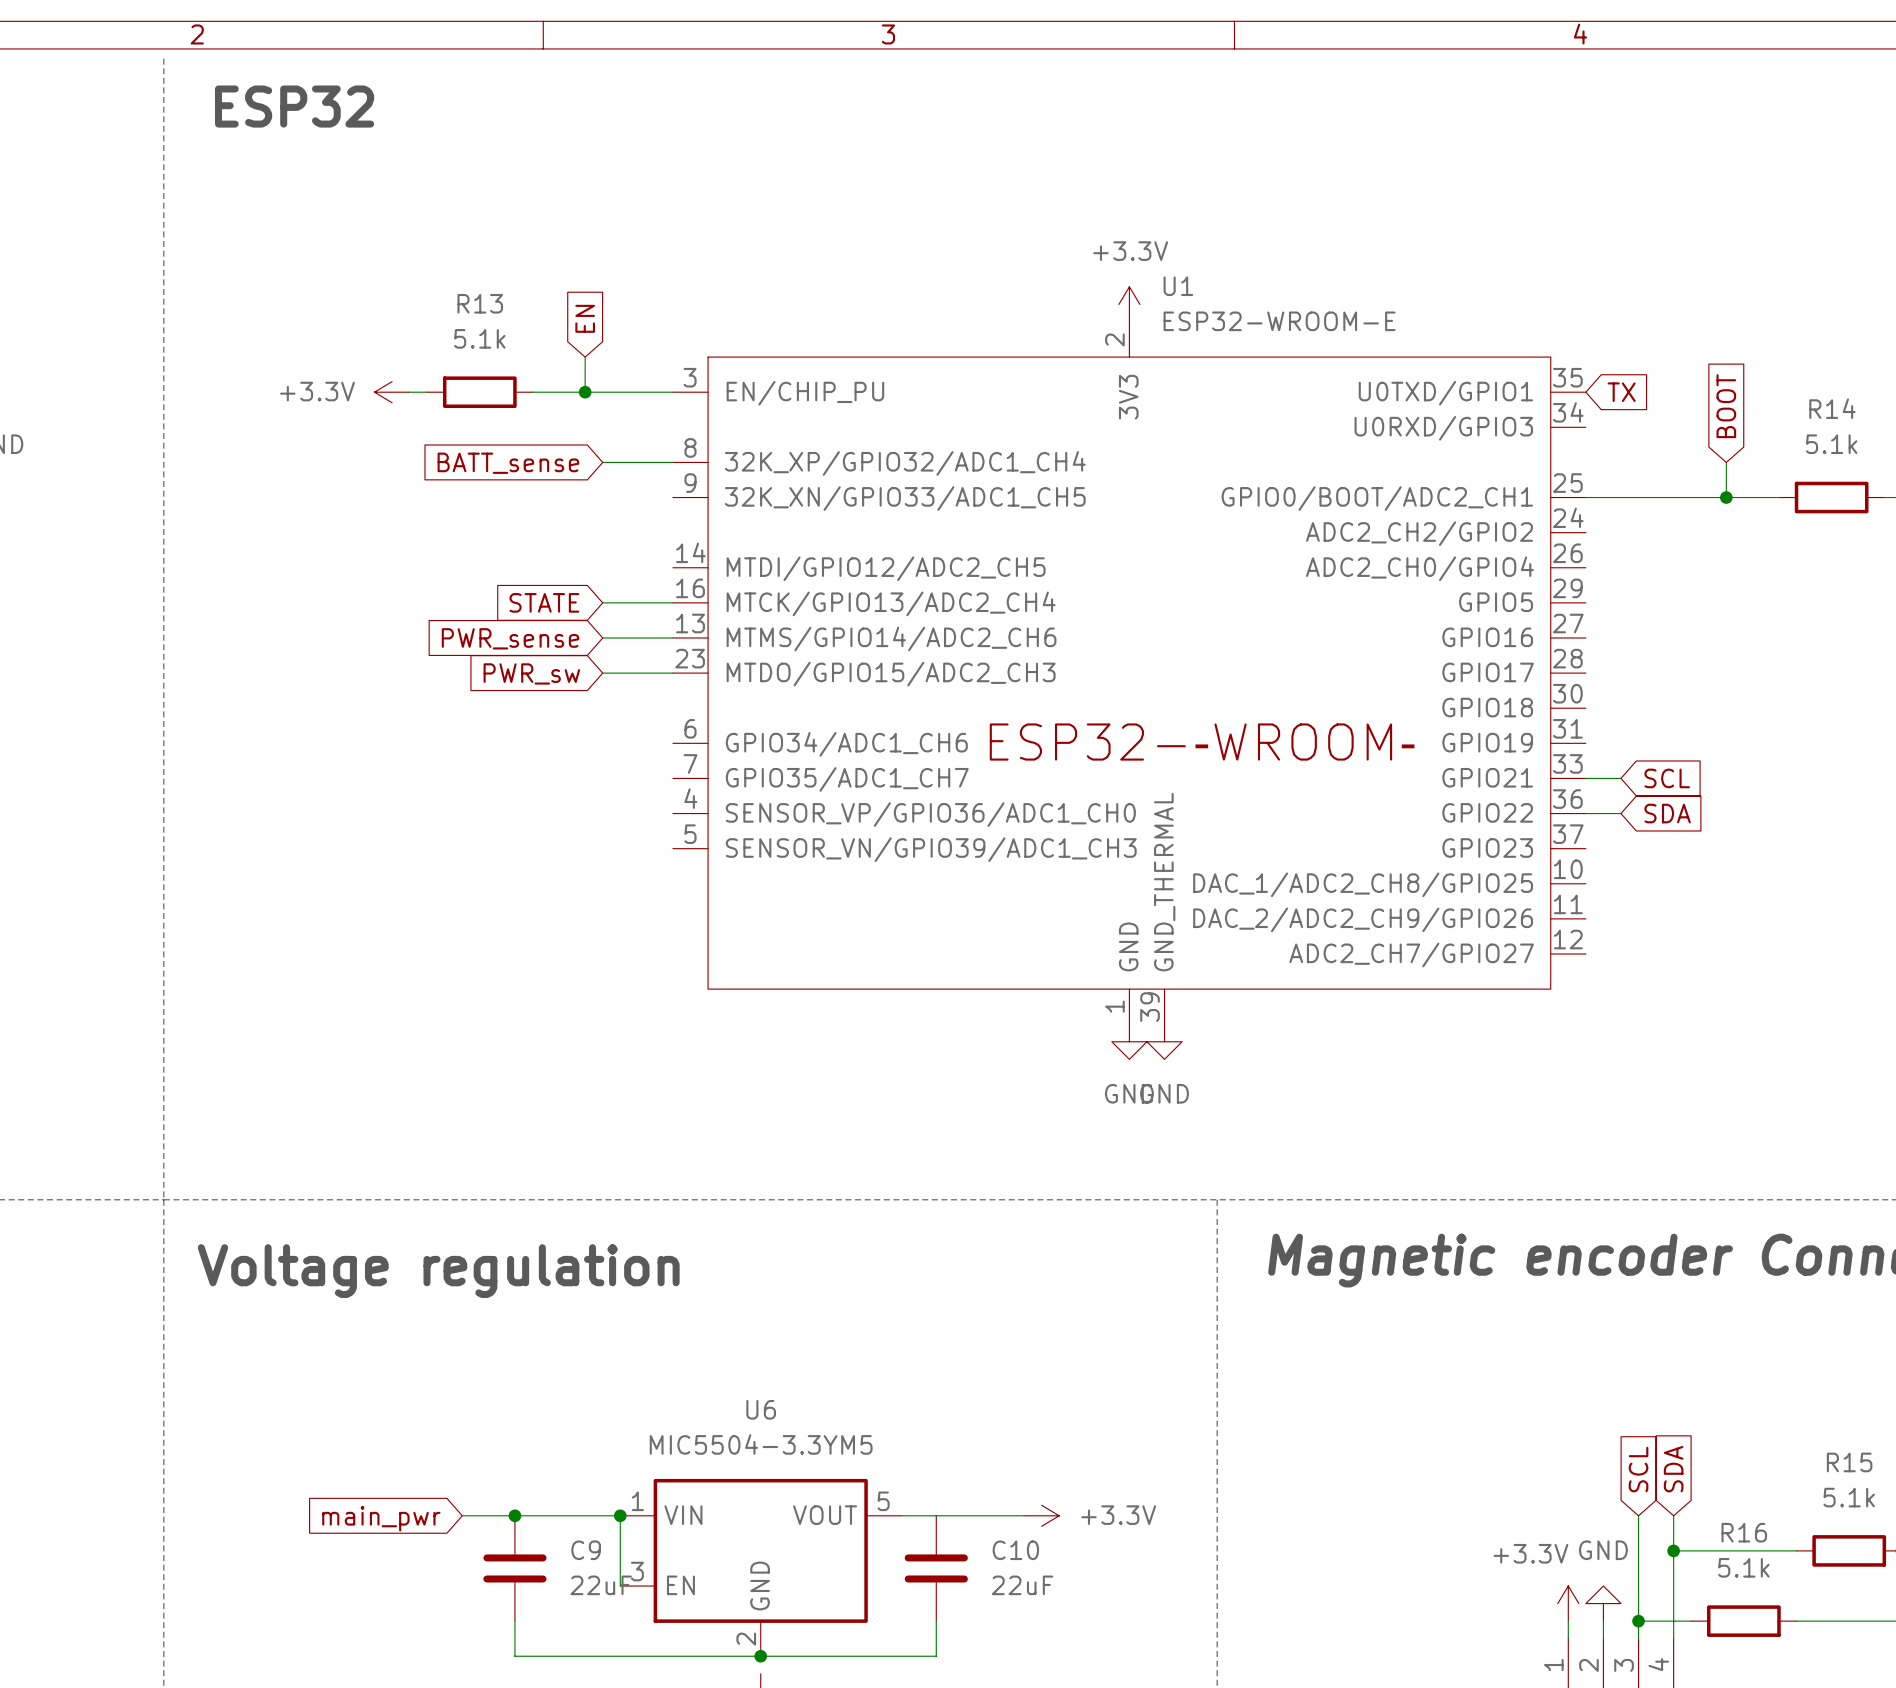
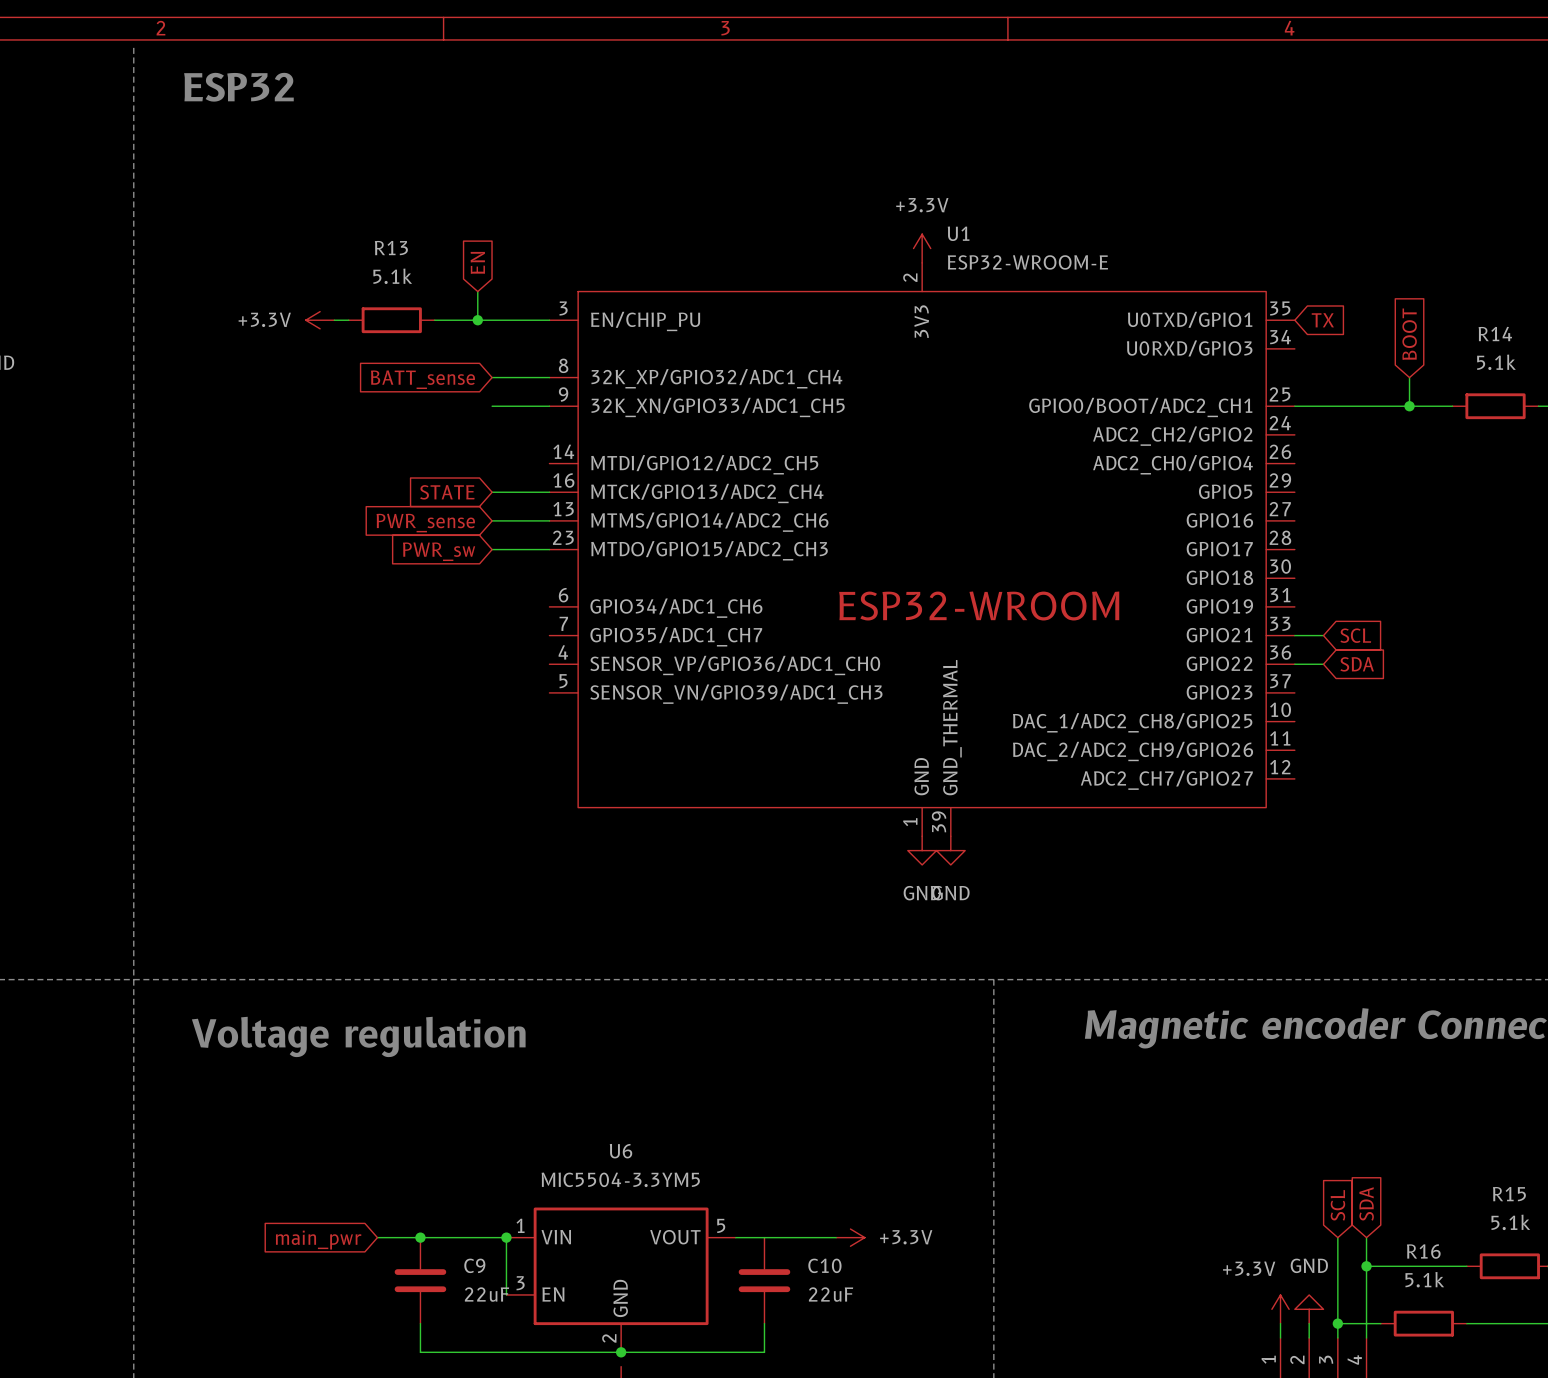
wire: none -> (492, 406) (549, 406)

